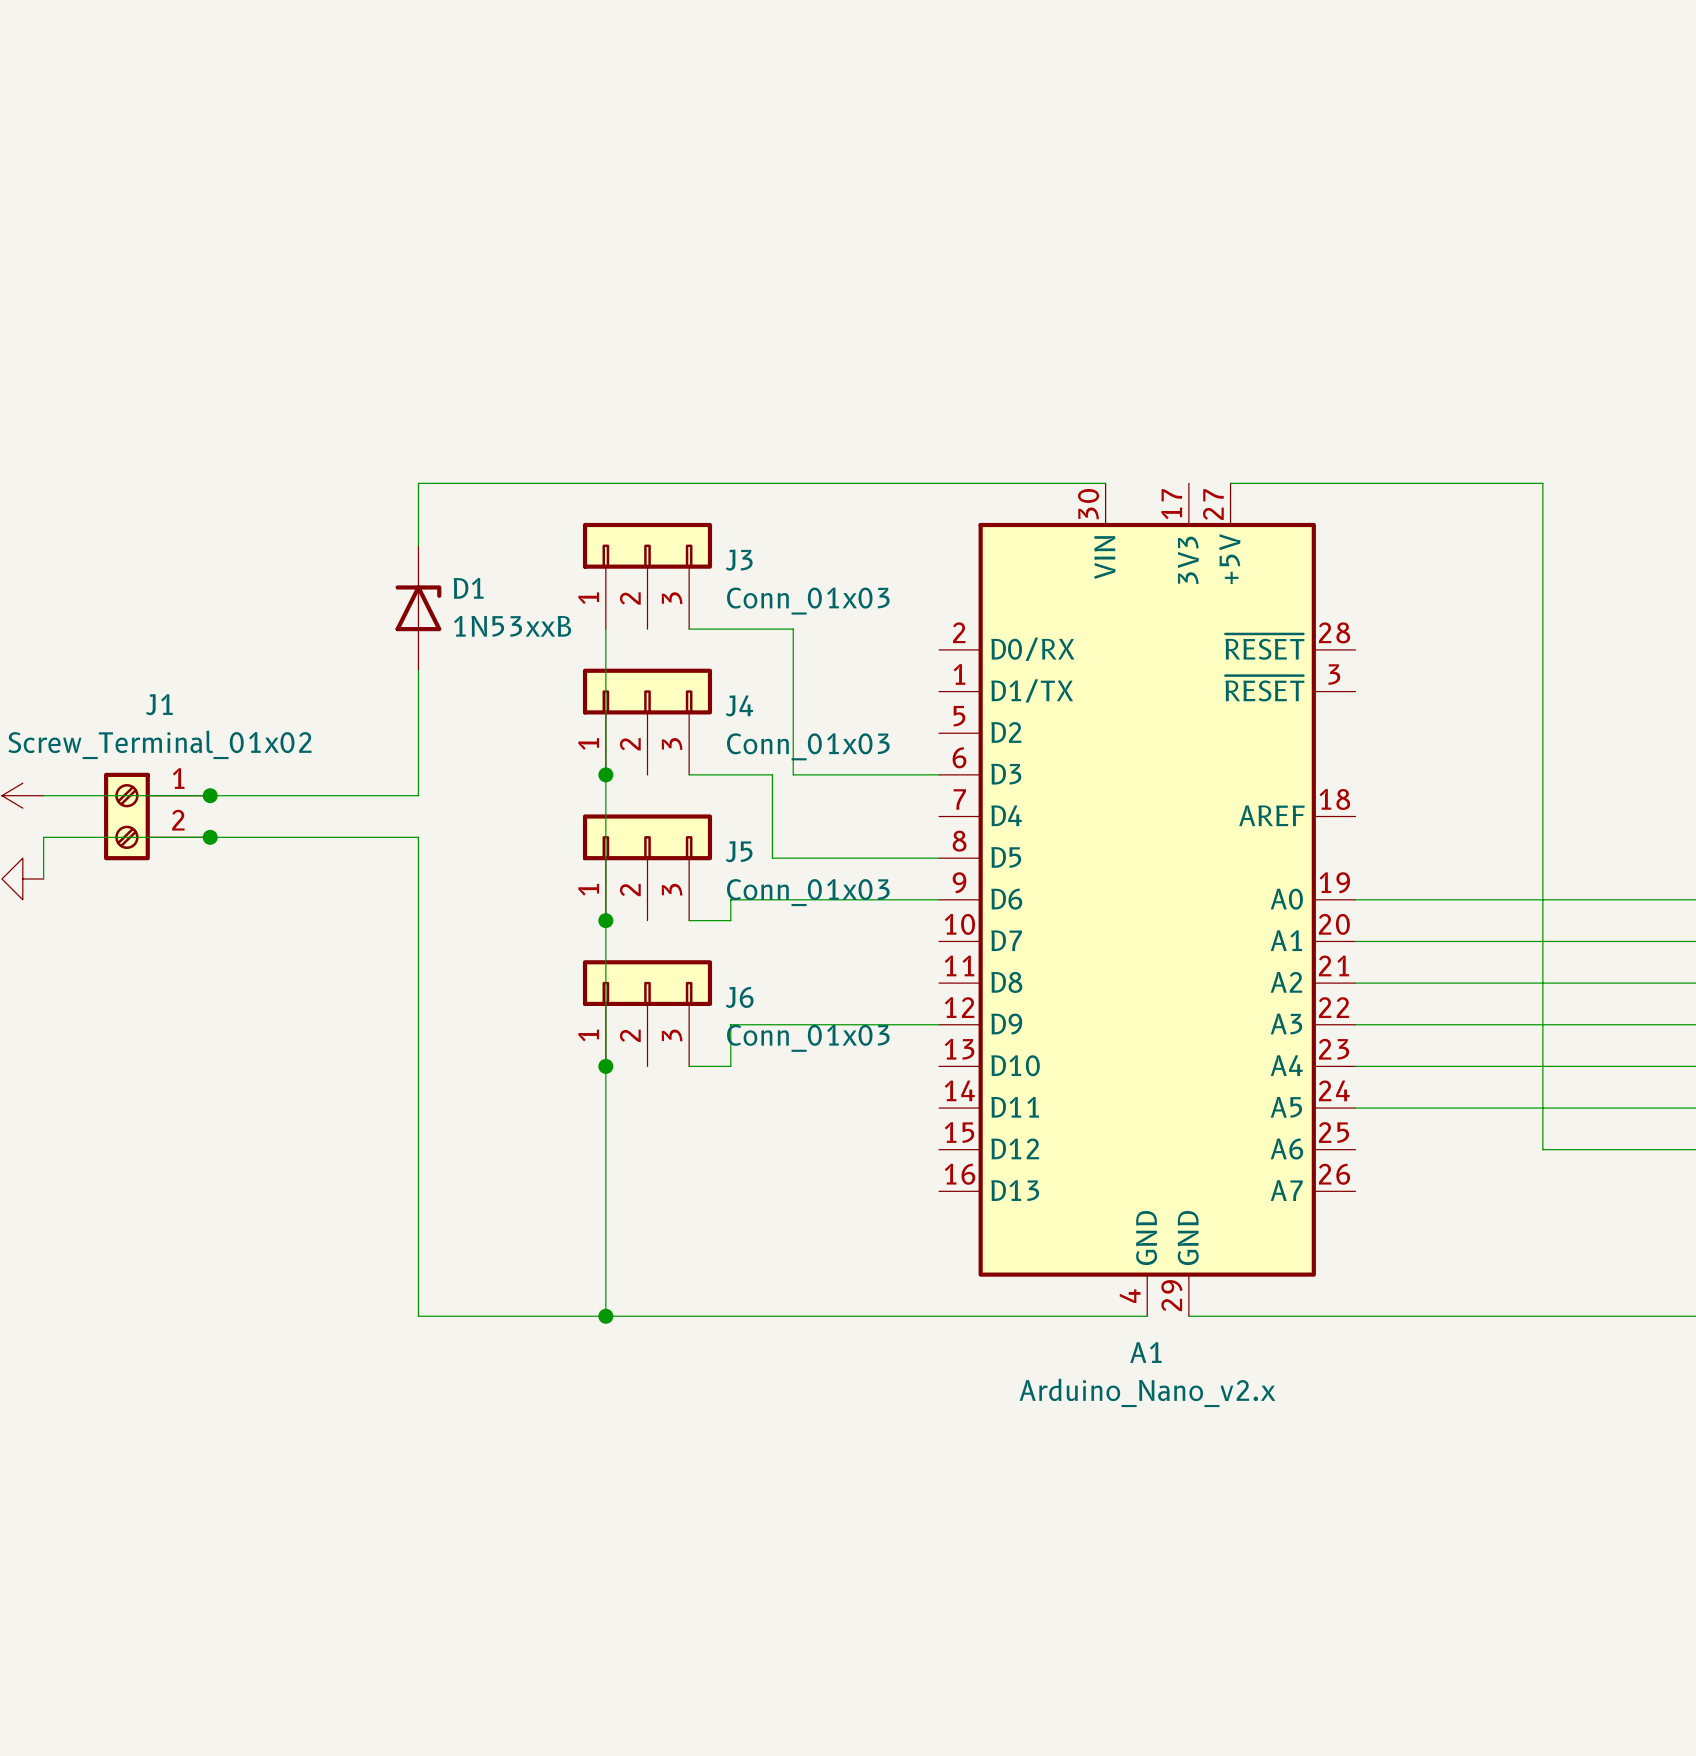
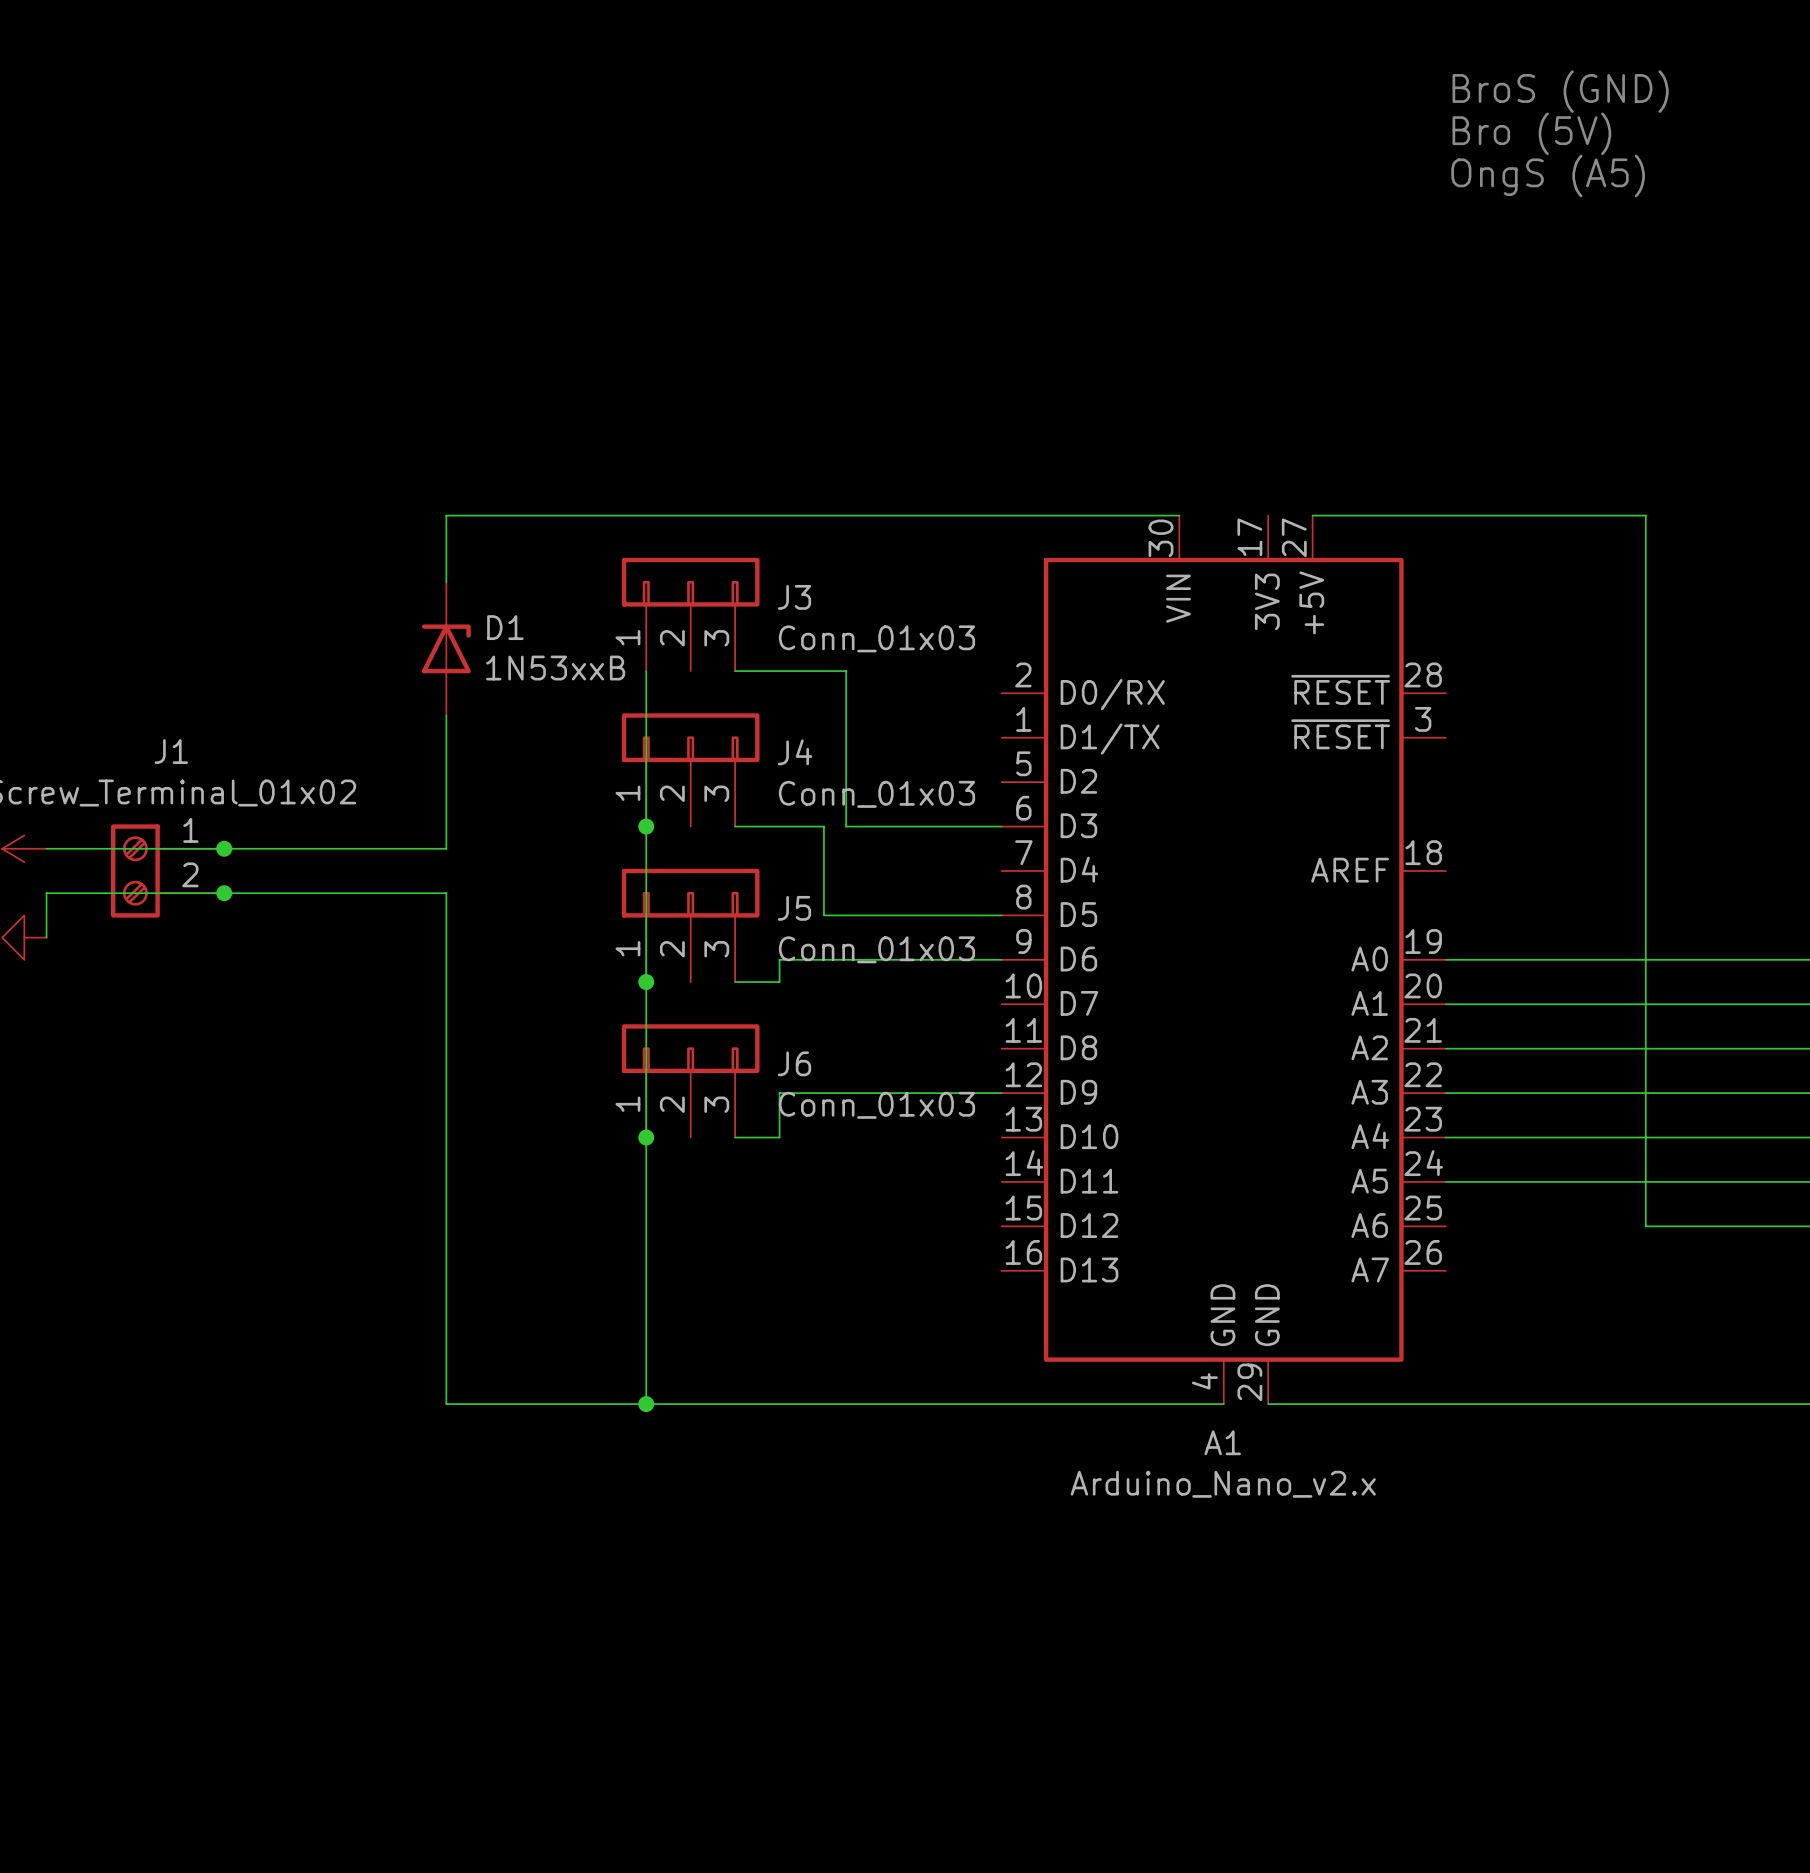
text: none -> BroS (GND) (1560, 91)
text: none -> Bro (5V) (1531, 133)
text: none -> OngS (A5) (1548, 175)

